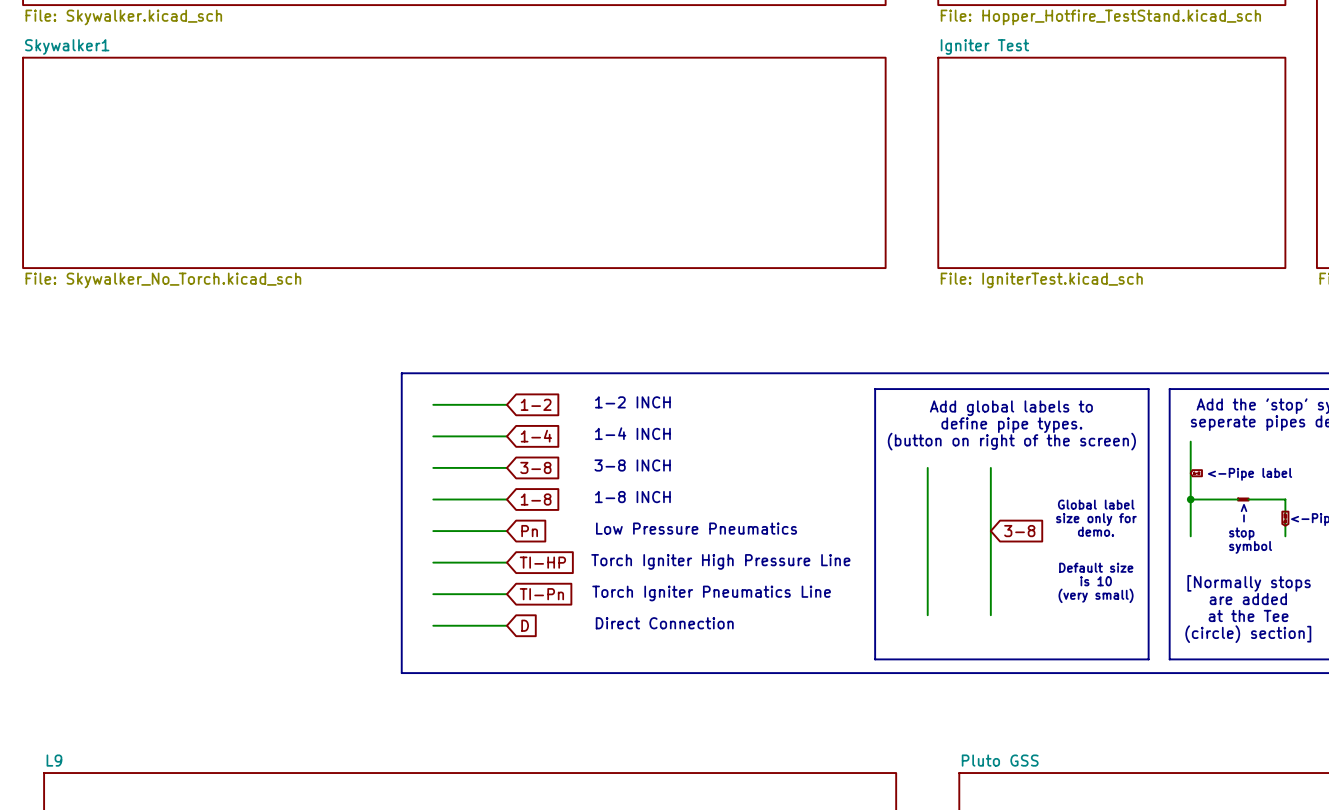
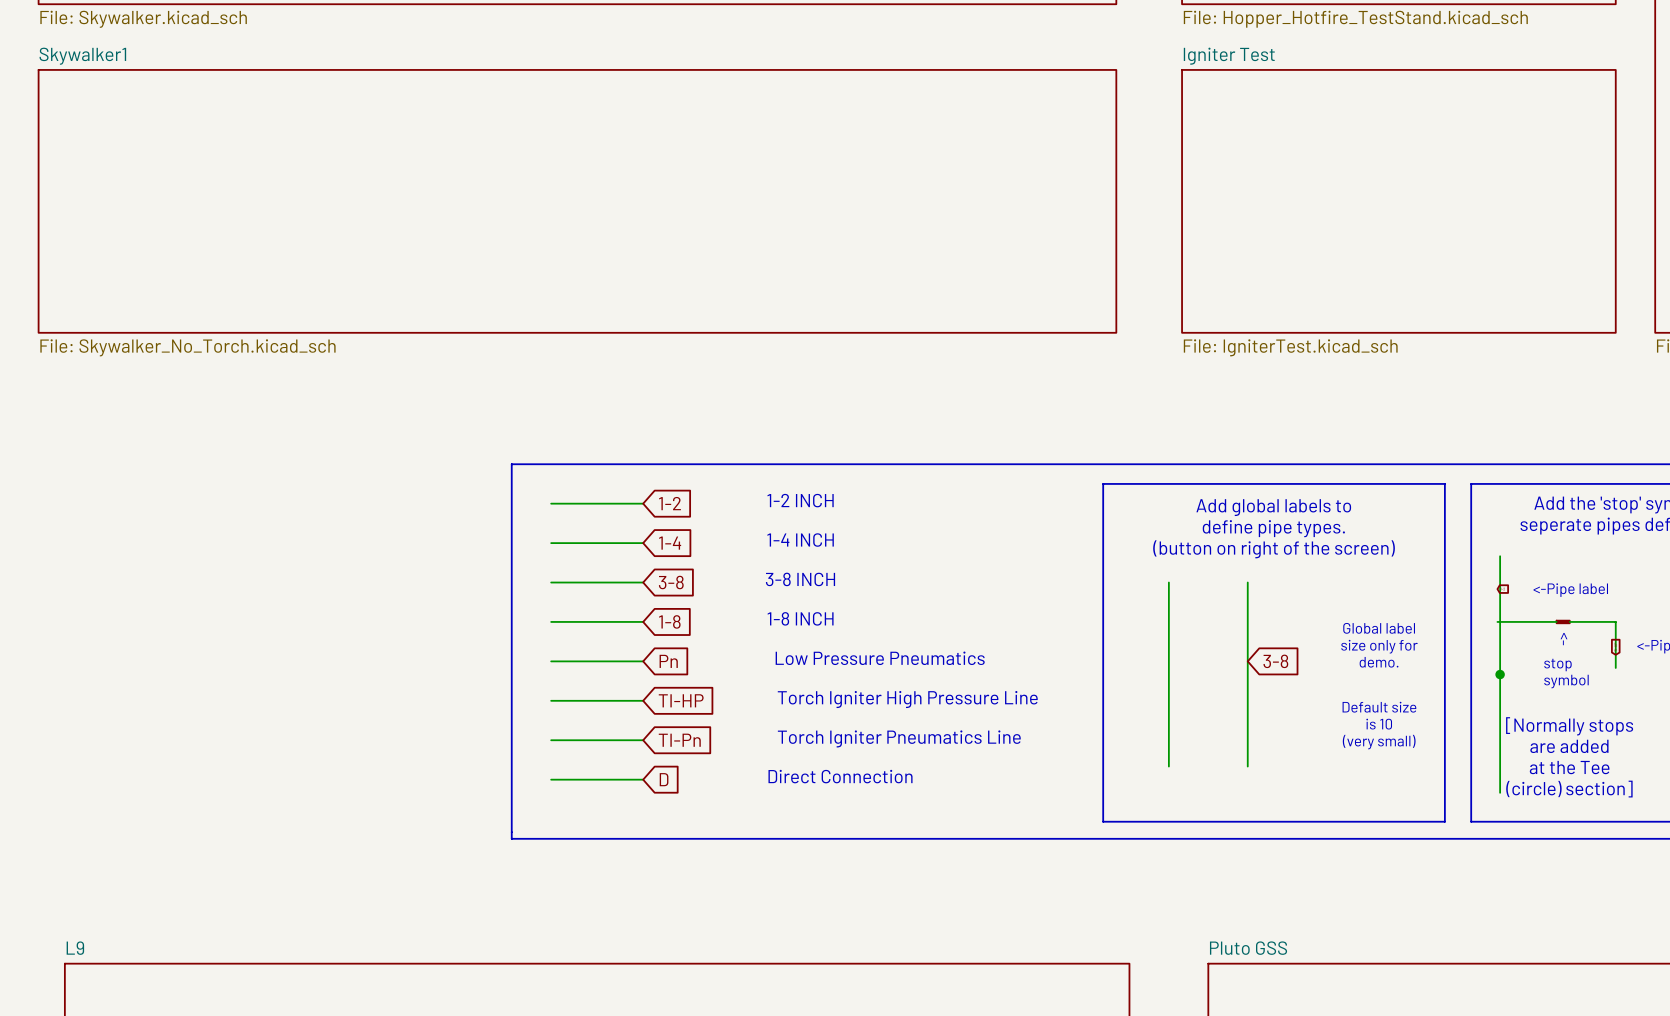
wire: (1190, 441) (1190, 536) -> none
wire: none -> (1500, 556) (1500, 792)
junction position: (1190, 499) -> (1500, 674)

